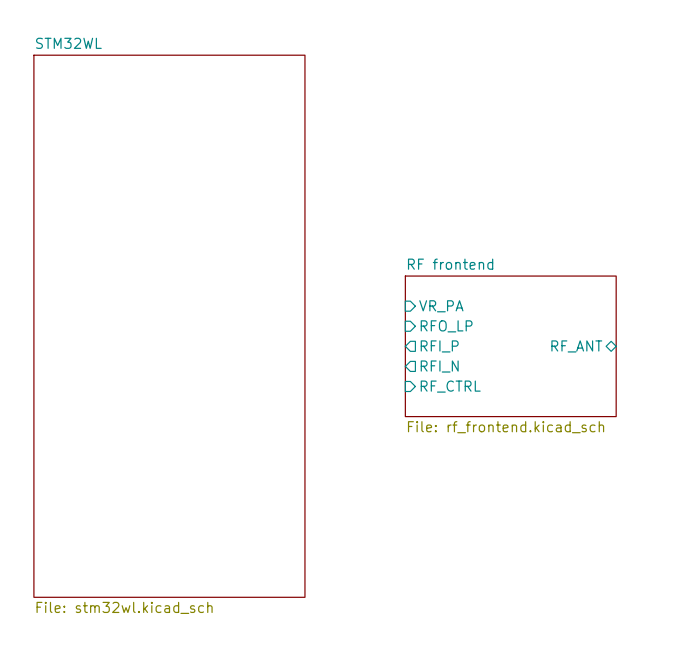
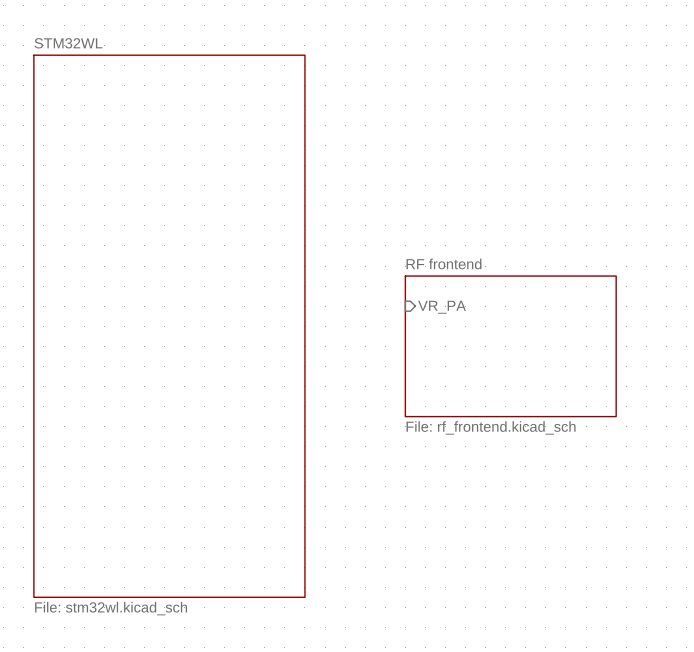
sheet pin: RFO_LP (446, 326) -> none
sheet pin: RFI_P (439, 346) -> none
sheet pin: RF_ANT (576, 346) -> none
sheet pin: RFI_N (439, 366) -> none
sheet pin: RF_CTRL (450, 386) -> none

